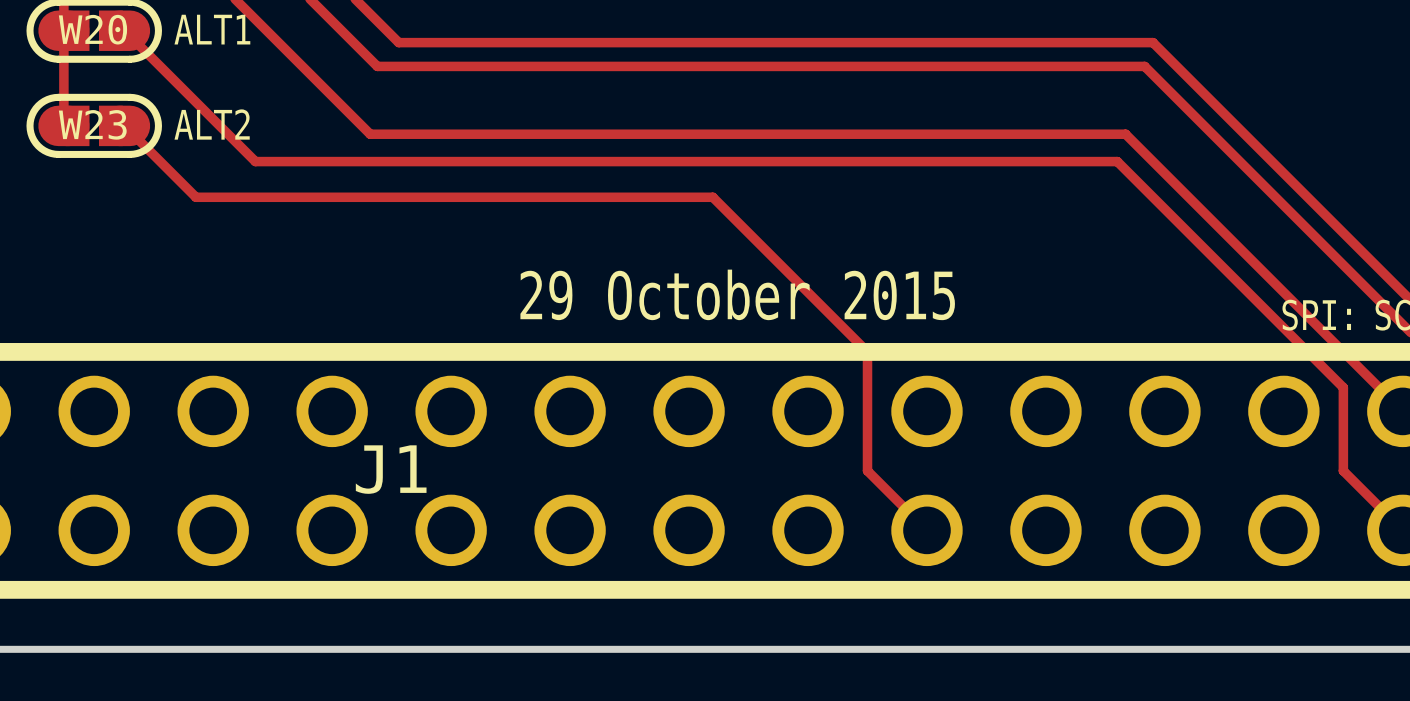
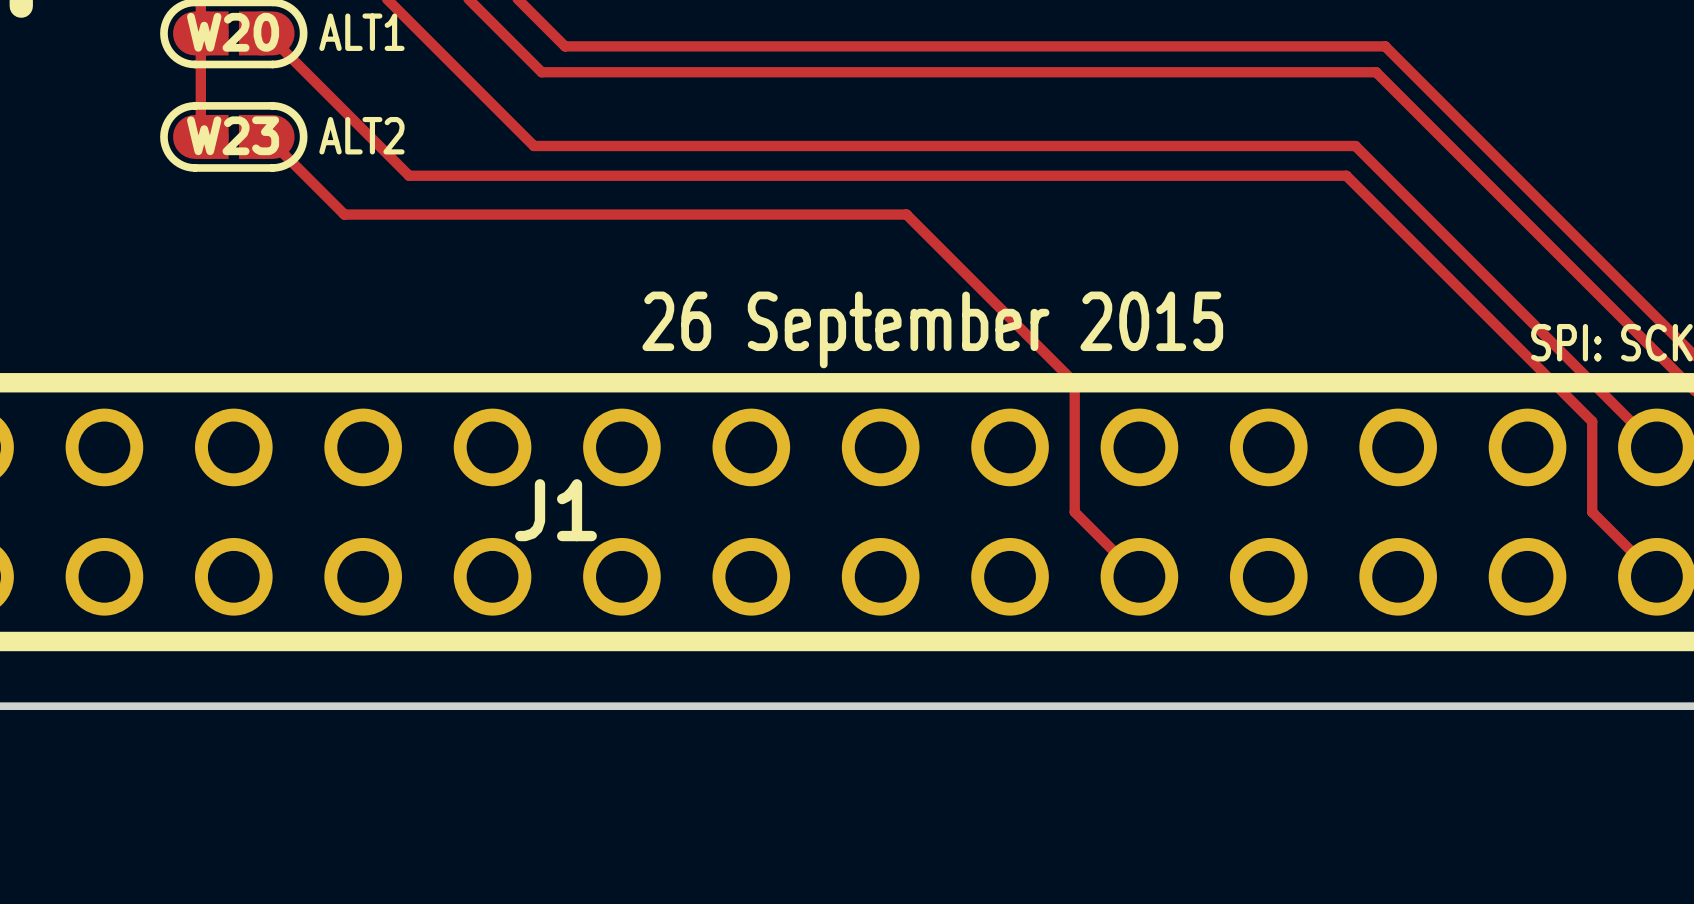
text: 29 October 2015 (737, 294) -> 26 September 2015 (932, 329)

